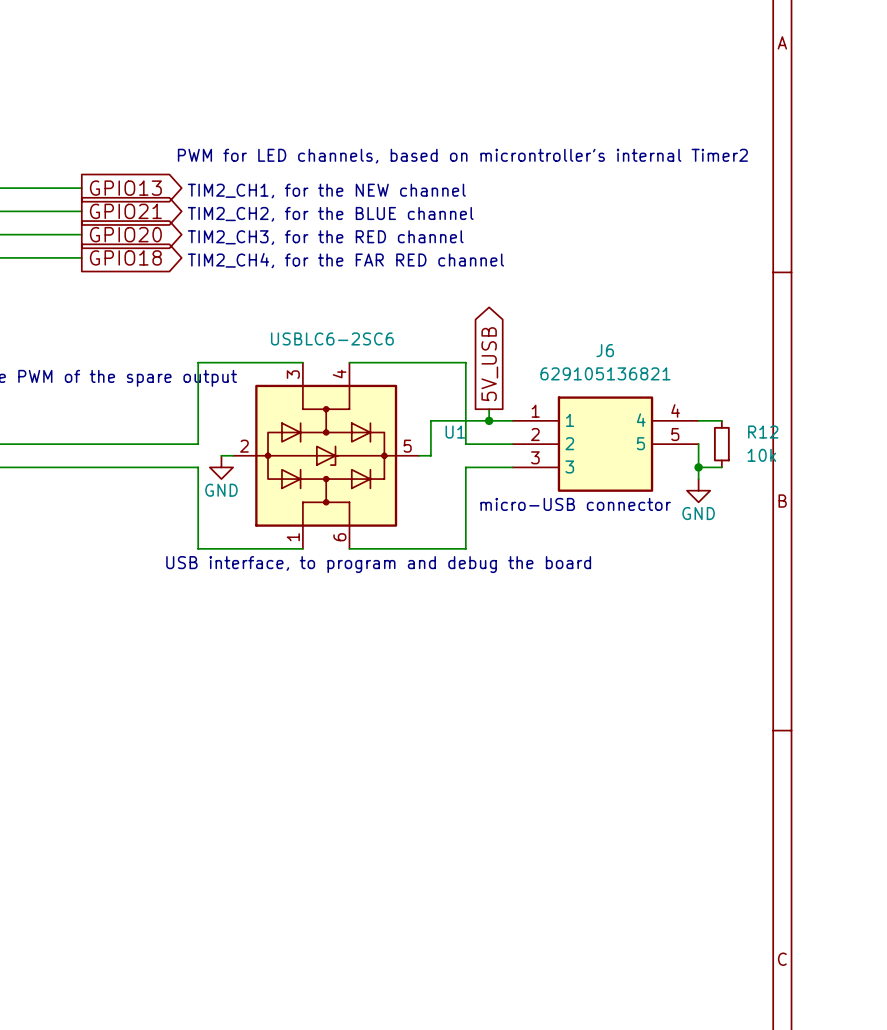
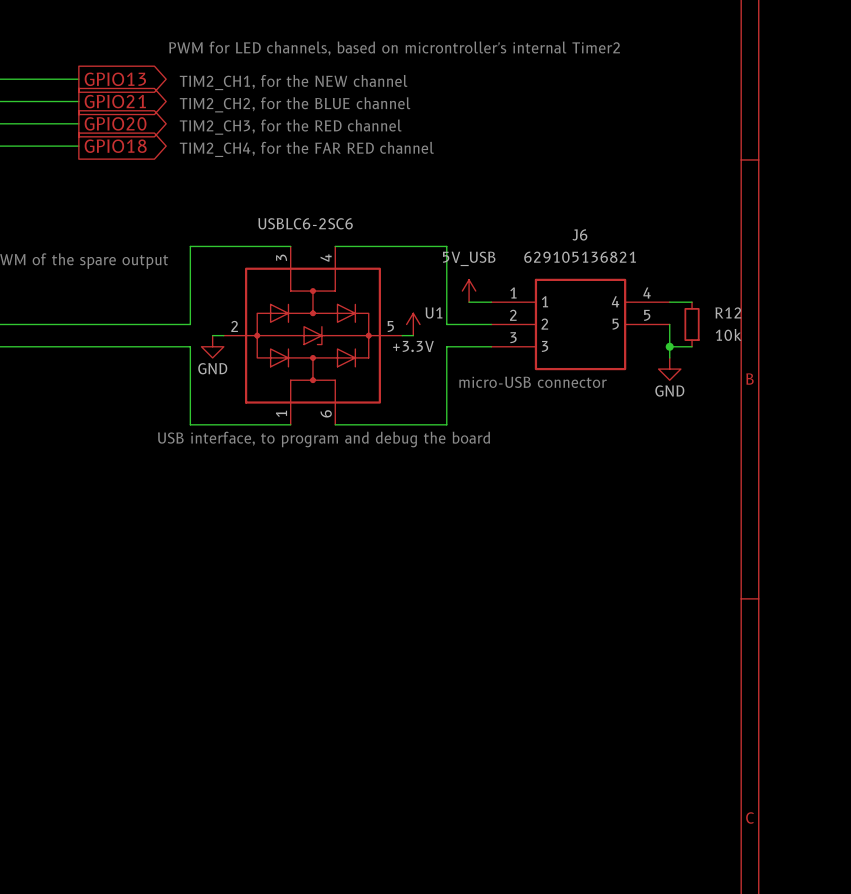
global label: 5V_USB (489, 364) -> none
wire: (489, 409) (489, 420) (430, 420) (430, 455) -> none
power symbol: none -> 5V_USB (469, 291)
junction: (489, 420) -> none
power symbol: none -> +3.3V (413, 324)

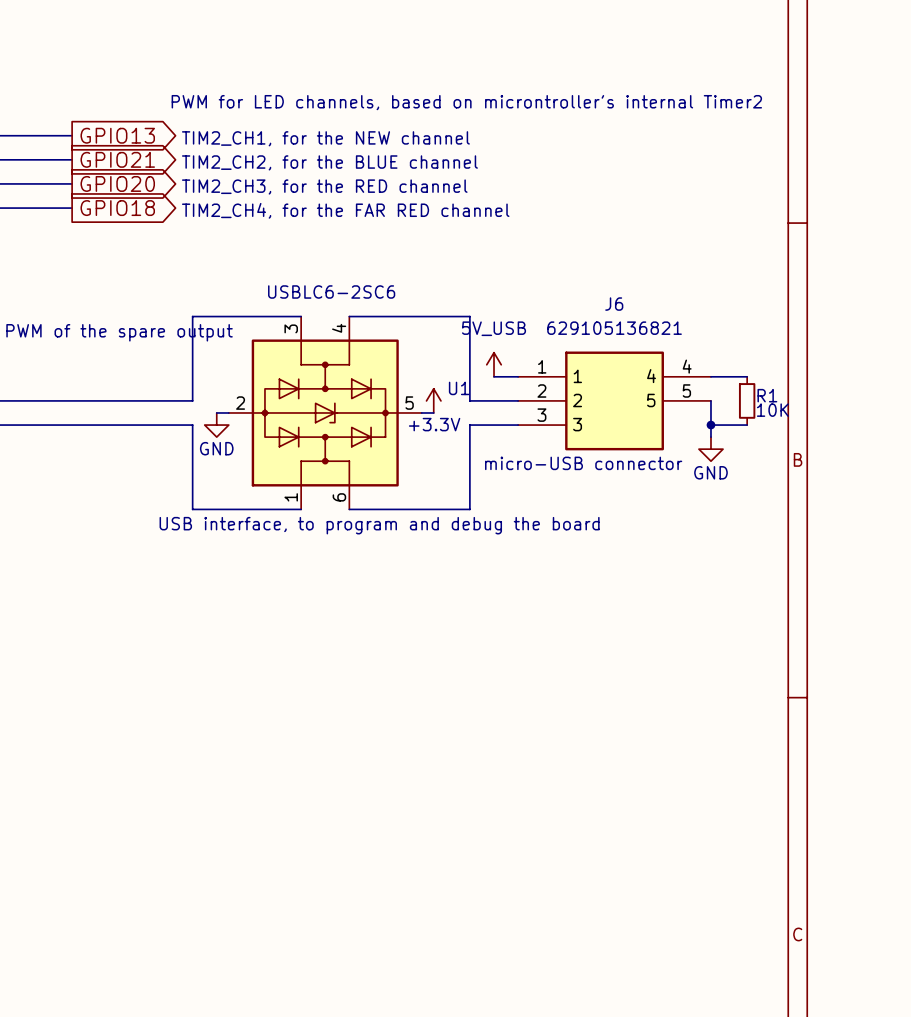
wire: none -> (735, 376) (747, 376)
R12: 10k (692, 324) -> none
R1: none -> 10K (747, 400)
wire: none -> (735, 425) (747, 425)

